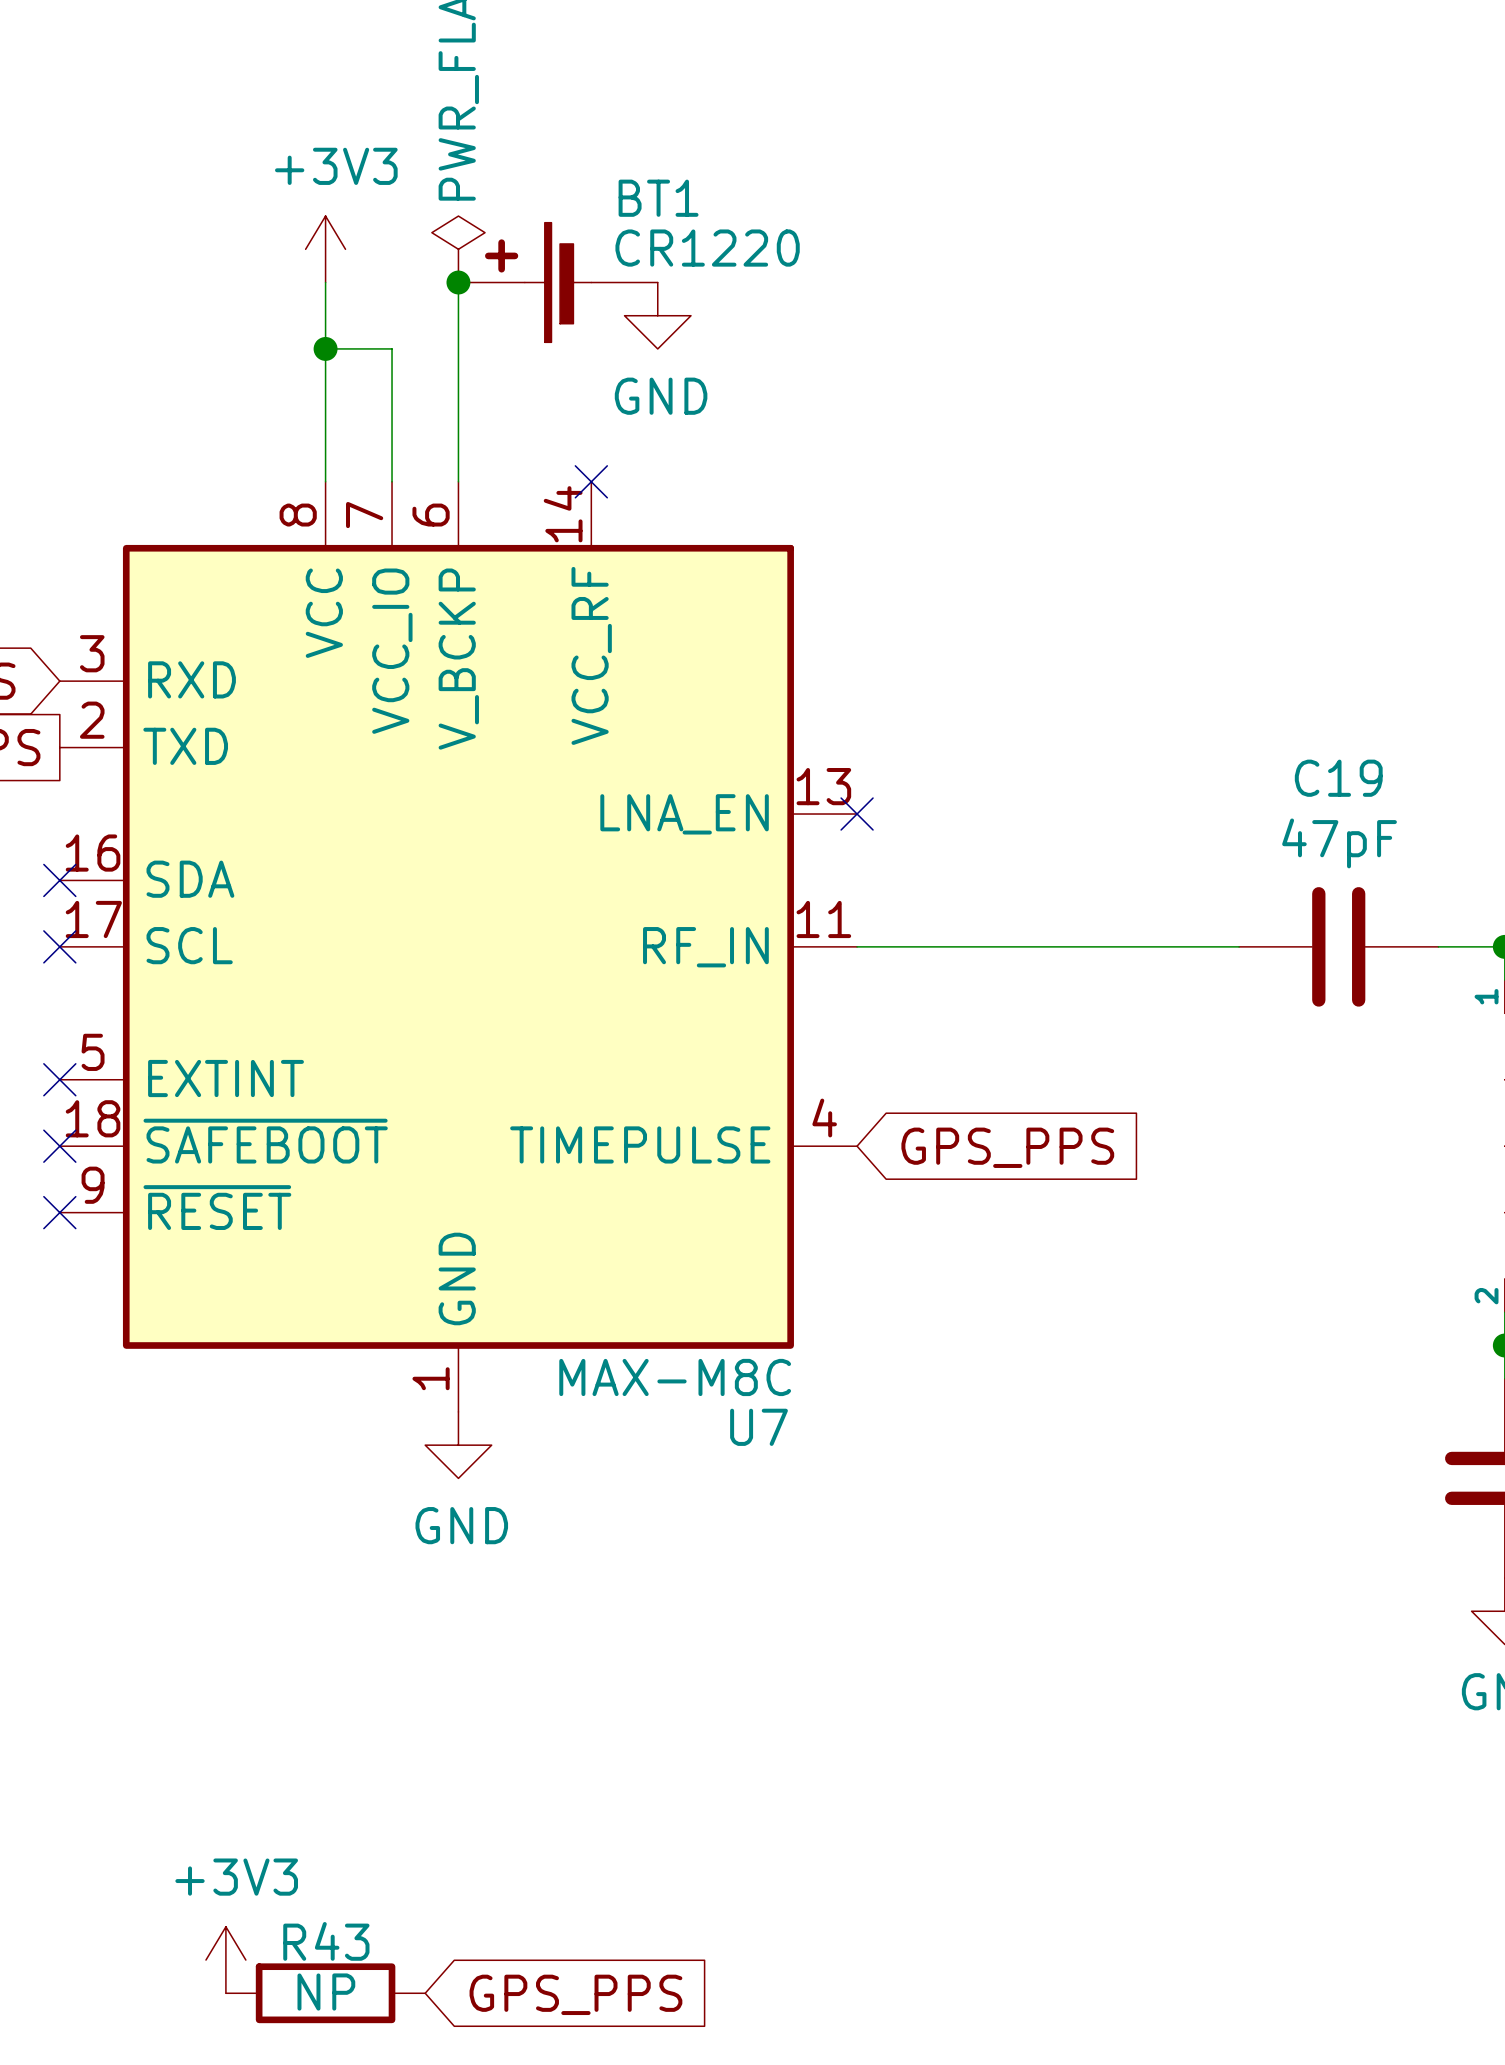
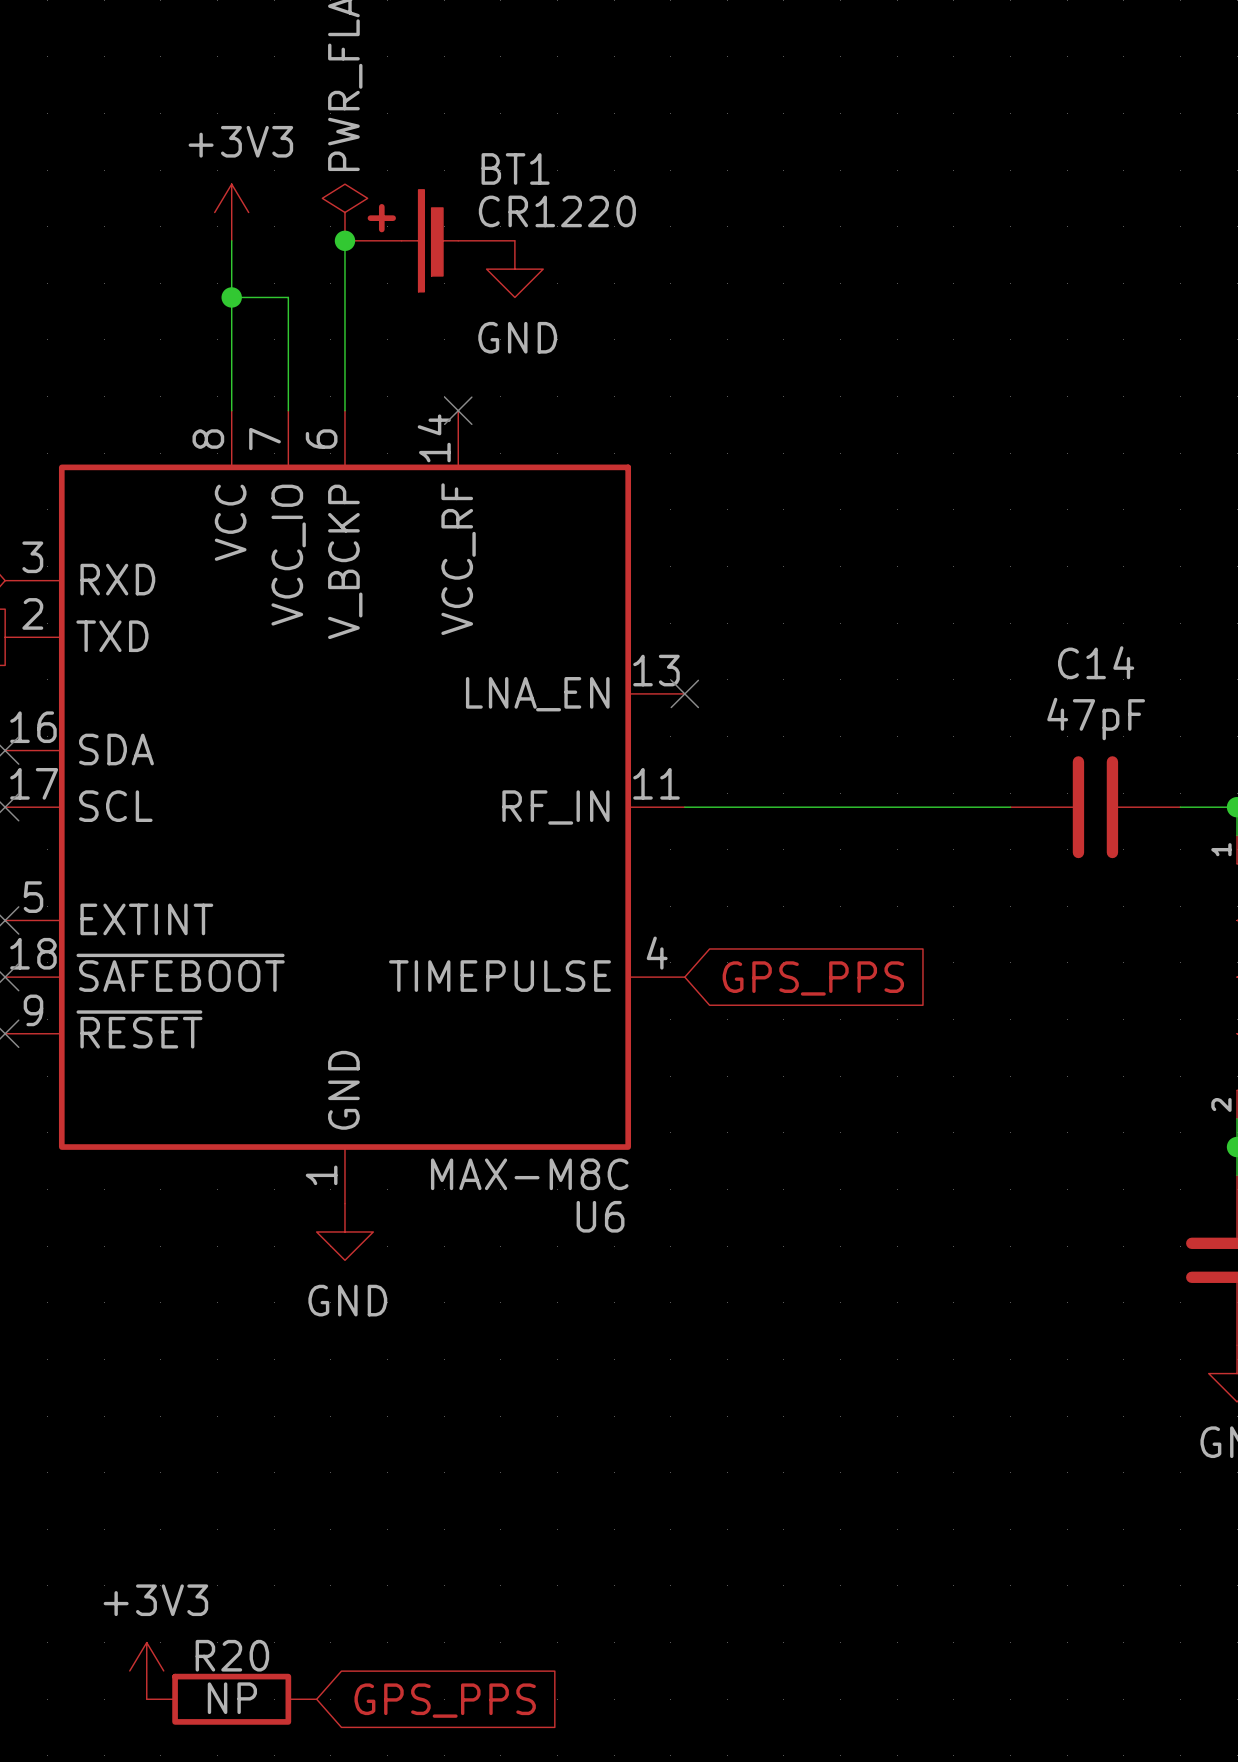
C19 name: C19 (1338, 778) -> C14 (1096, 662)
U7 name: U7 (759, 1427) -> U6 (600, 1216)
R43 name: R43 (326, 1941) -> R20 (232, 1655)

